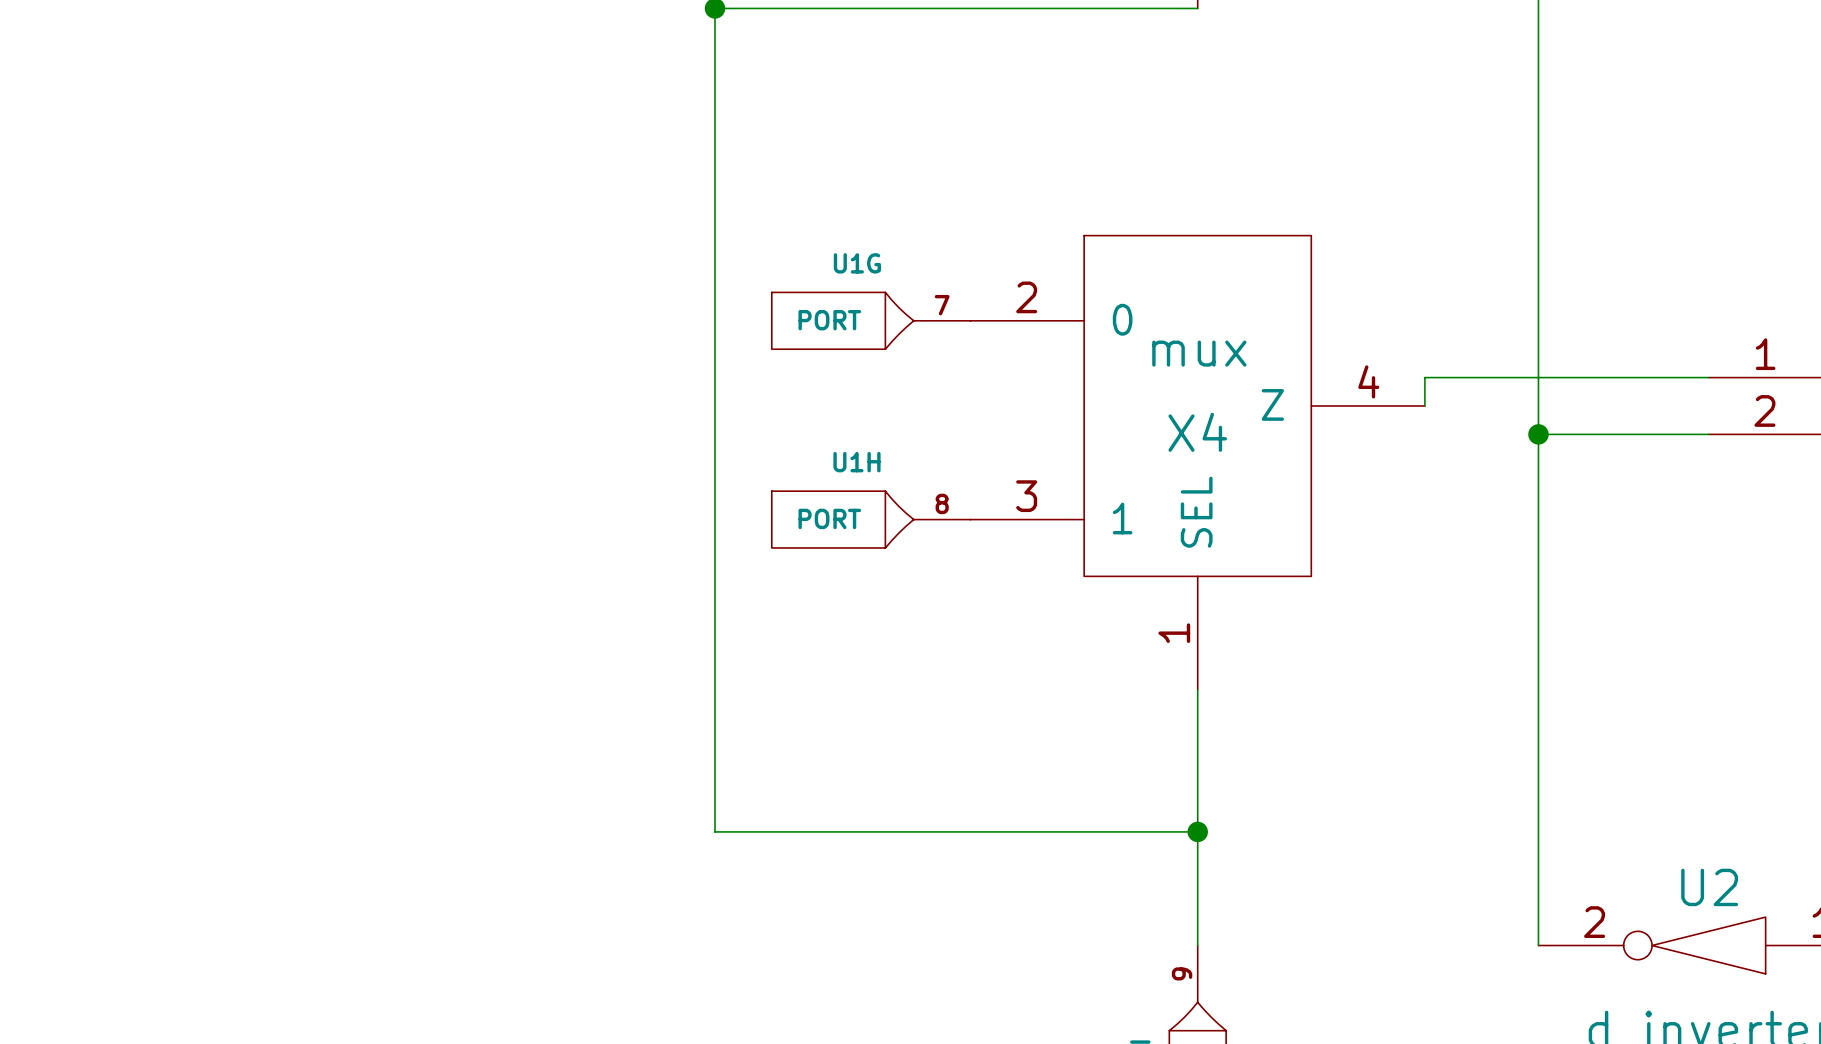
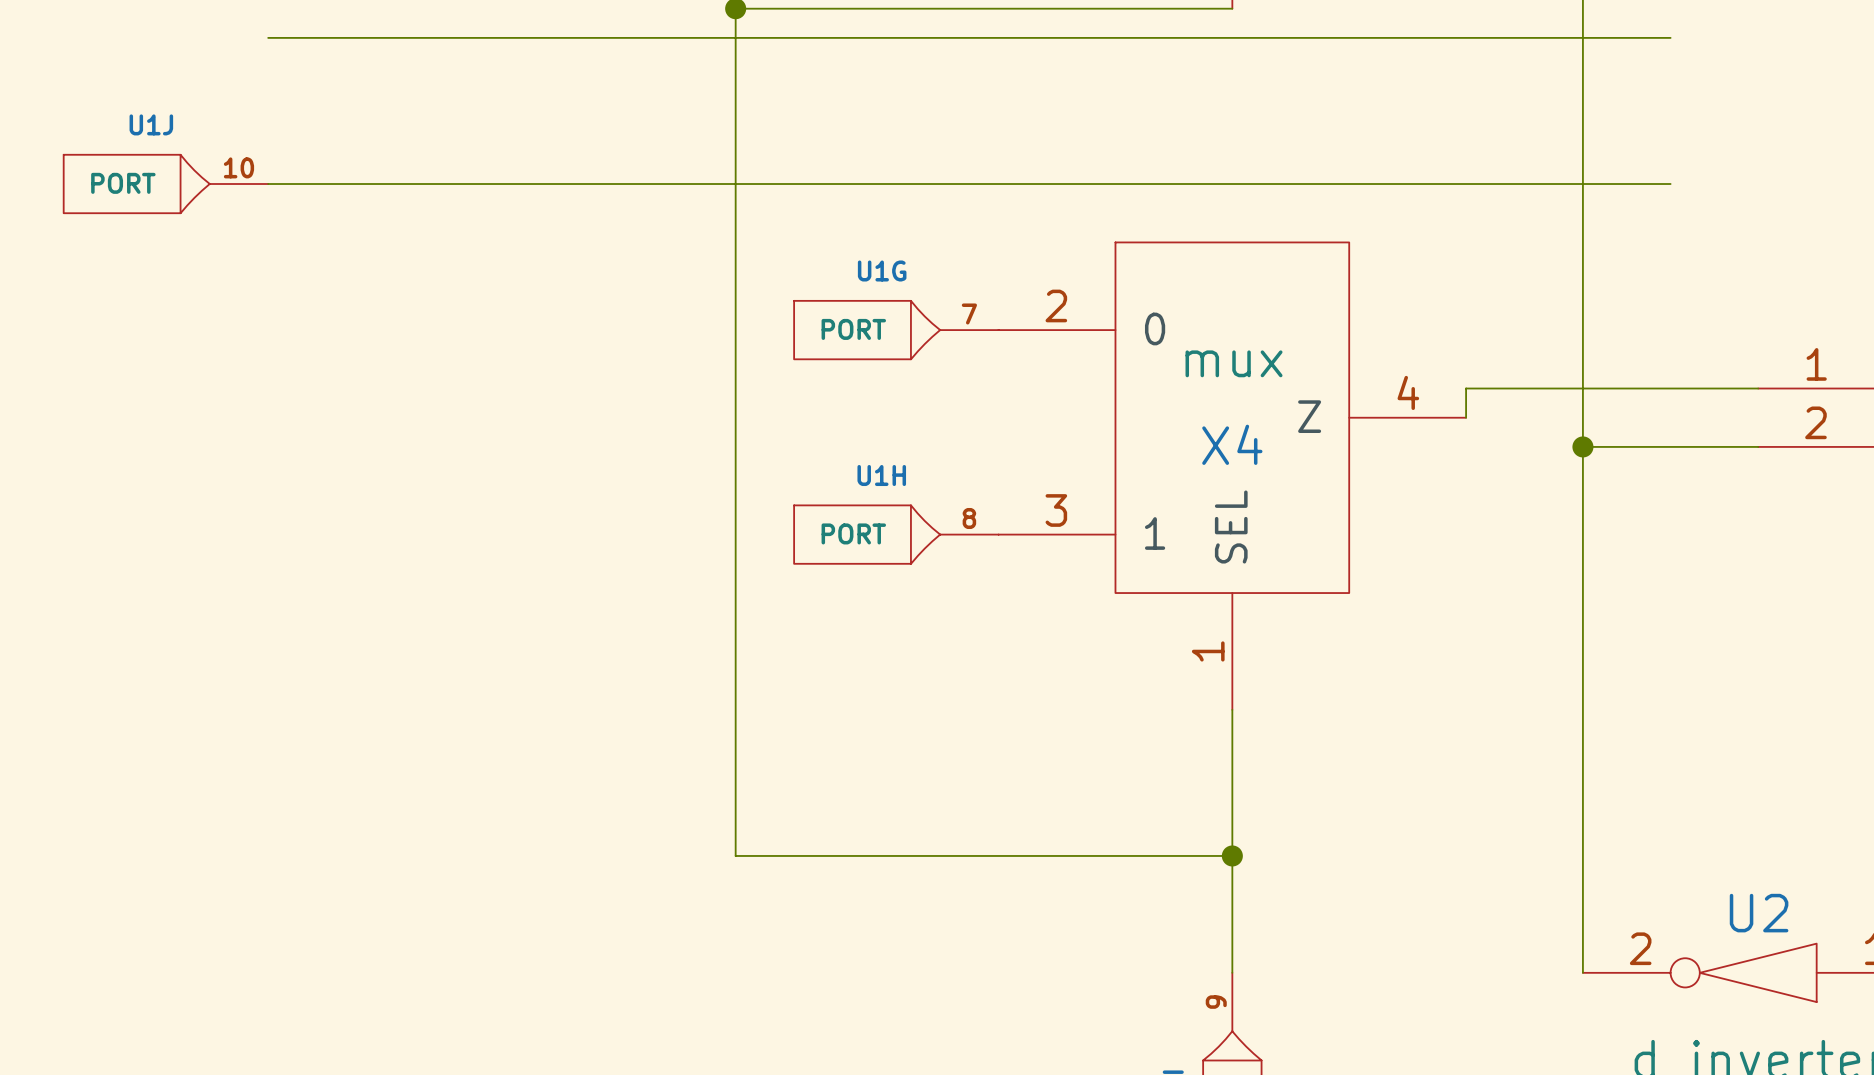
wire: none -> (268, 37) (1670, 37)
U1J: none -> PORT (165, 184)
wire: none -> (268, 184) (1670, 184)

